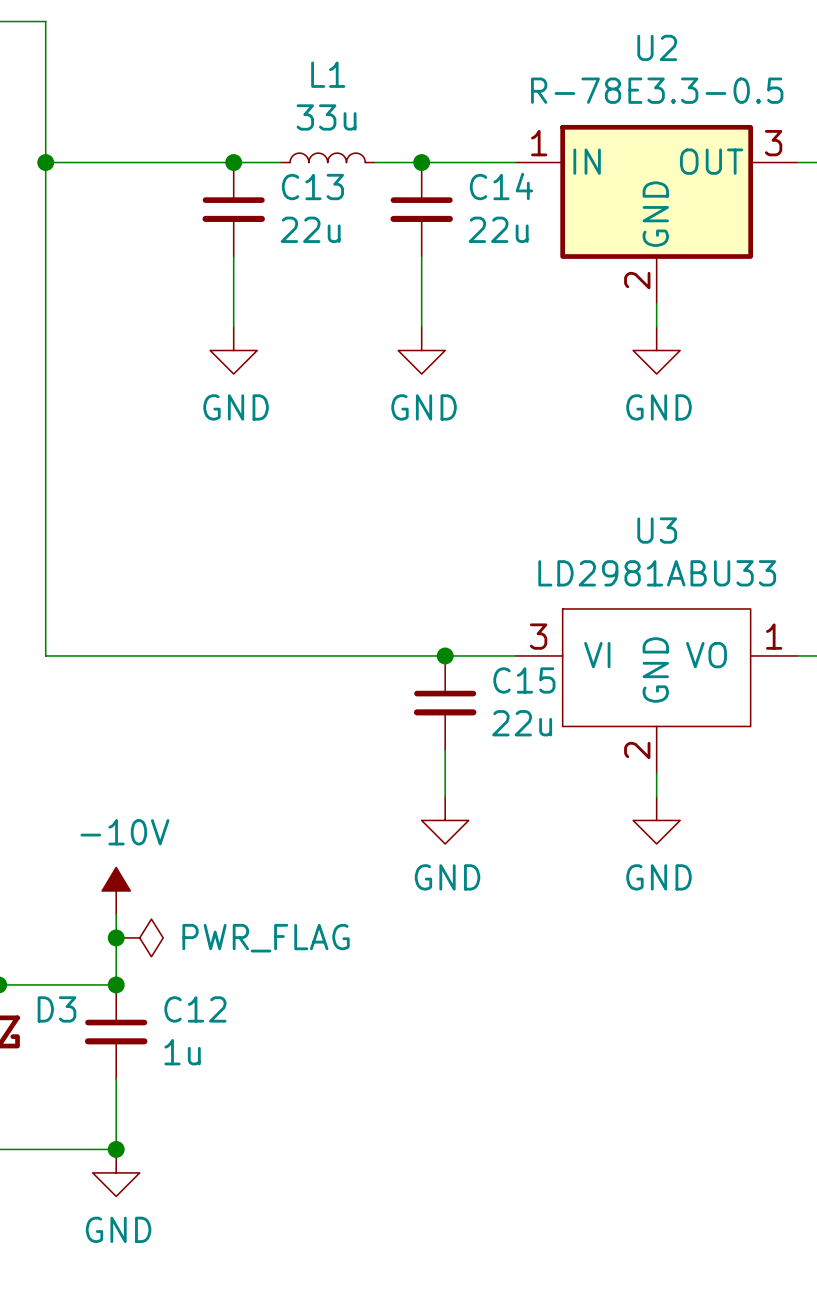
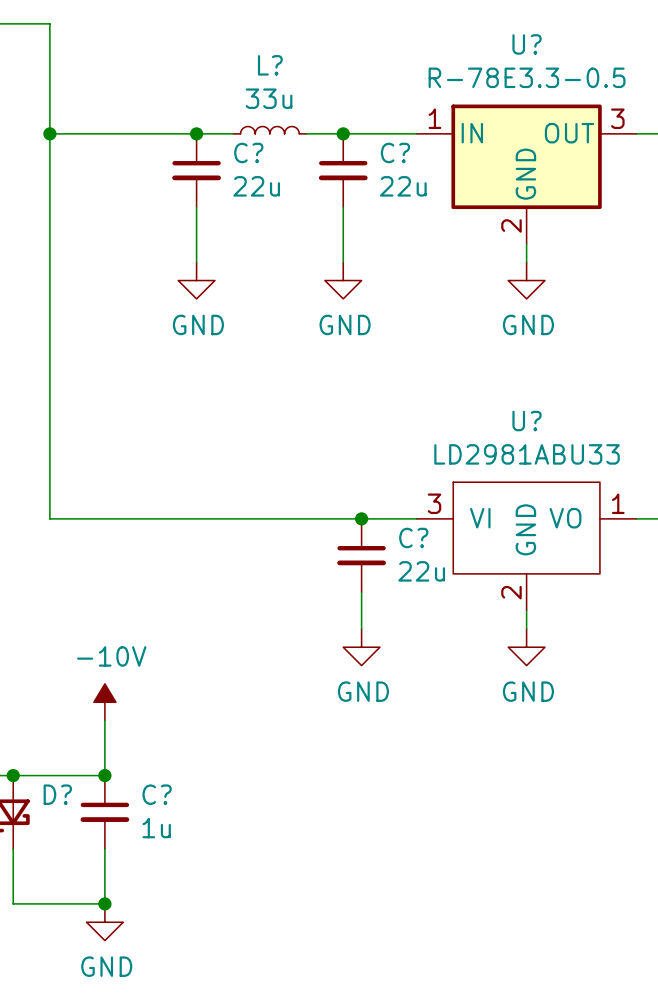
U2 name: U2 (657, 47) -> U? (527, 44)
L1 name: L1 (328, 74) -> L? (270, 65)
C14 name: C14 (501, 186) -> C? (395, 152)
C13 name: C13 (312, 187) -> C? (248, 152)
U3 name: U3 (657, 530) -> U? (527, 421)
C15 name: C15 (524, 680) -> C? (413, 538)
junction: (116, 937) -> none
power symbol: PWR_FLAG (139, 937) -> none
D3 name: D3 (56, 1009) -> D? (57, 794)
C12 name: C12 (195, 1009) -> C? (157, 794)

